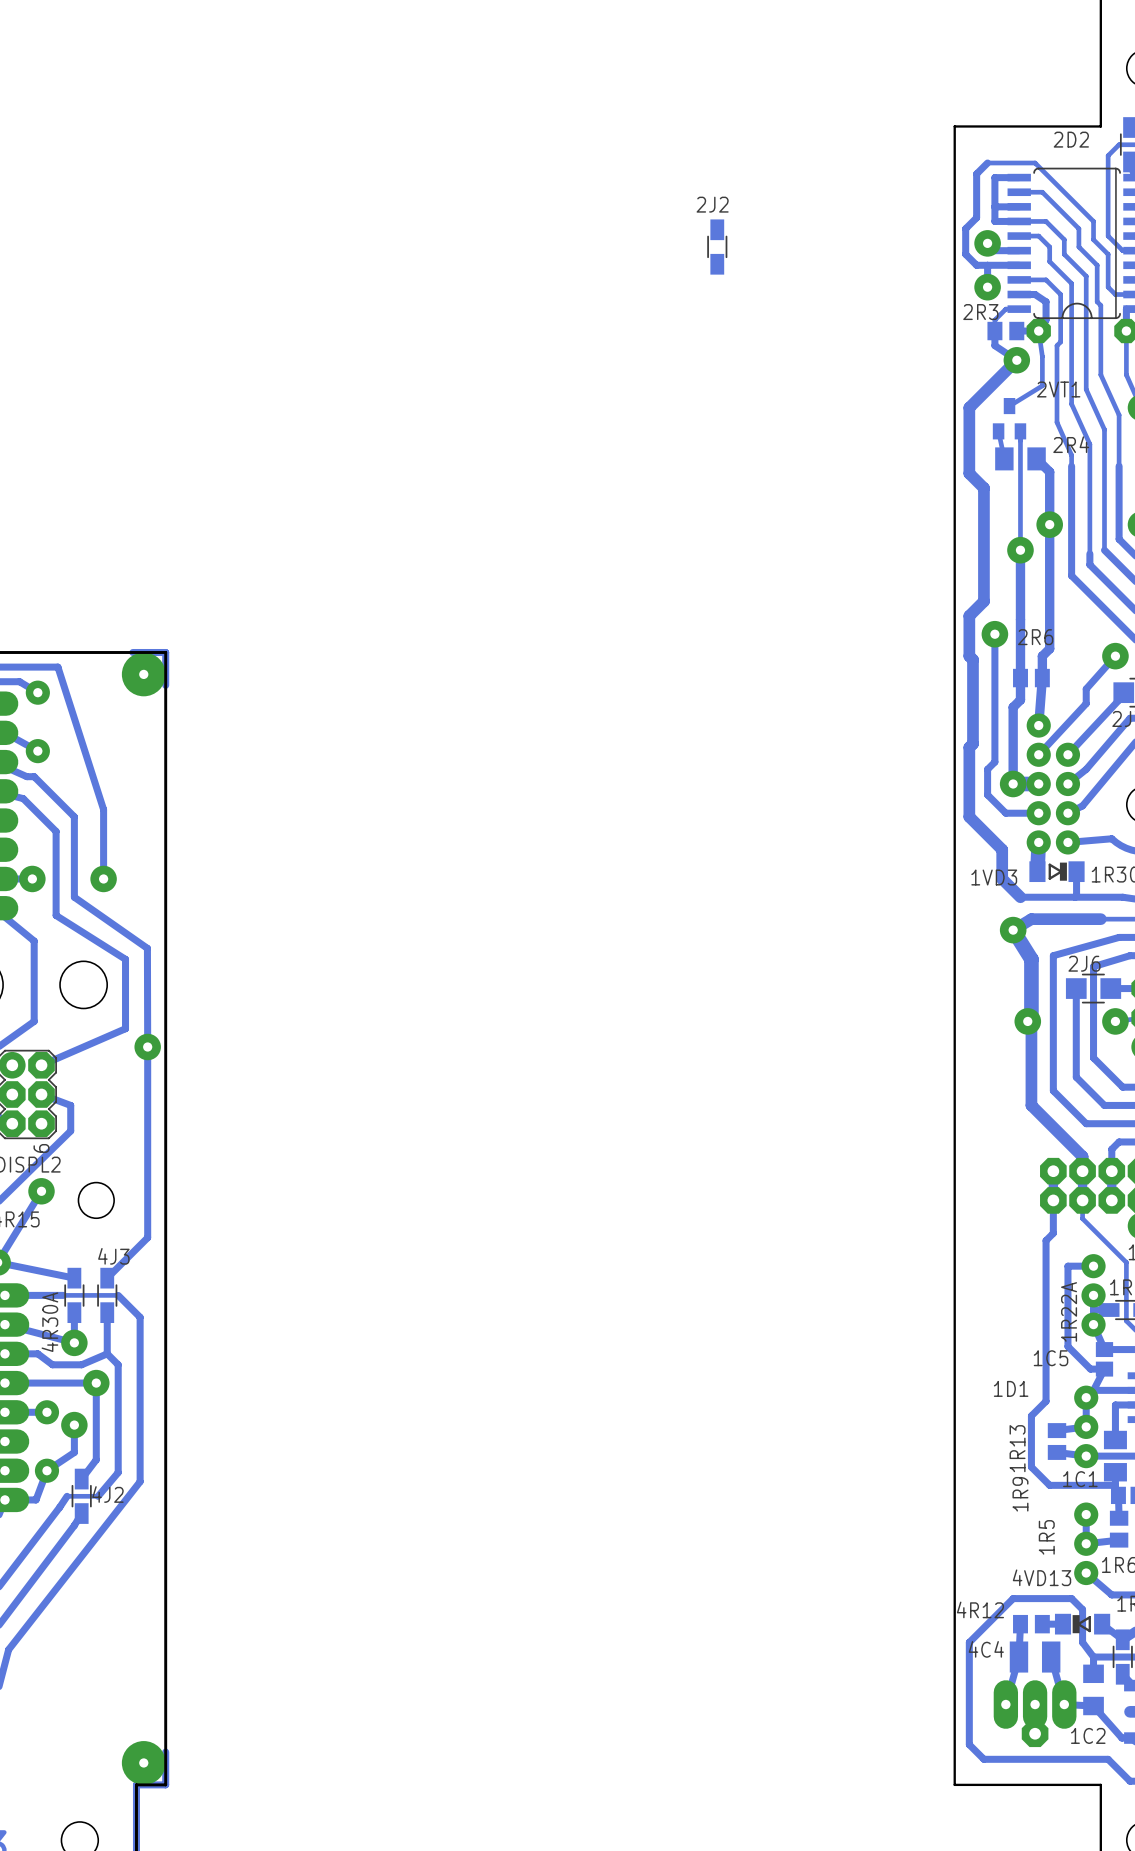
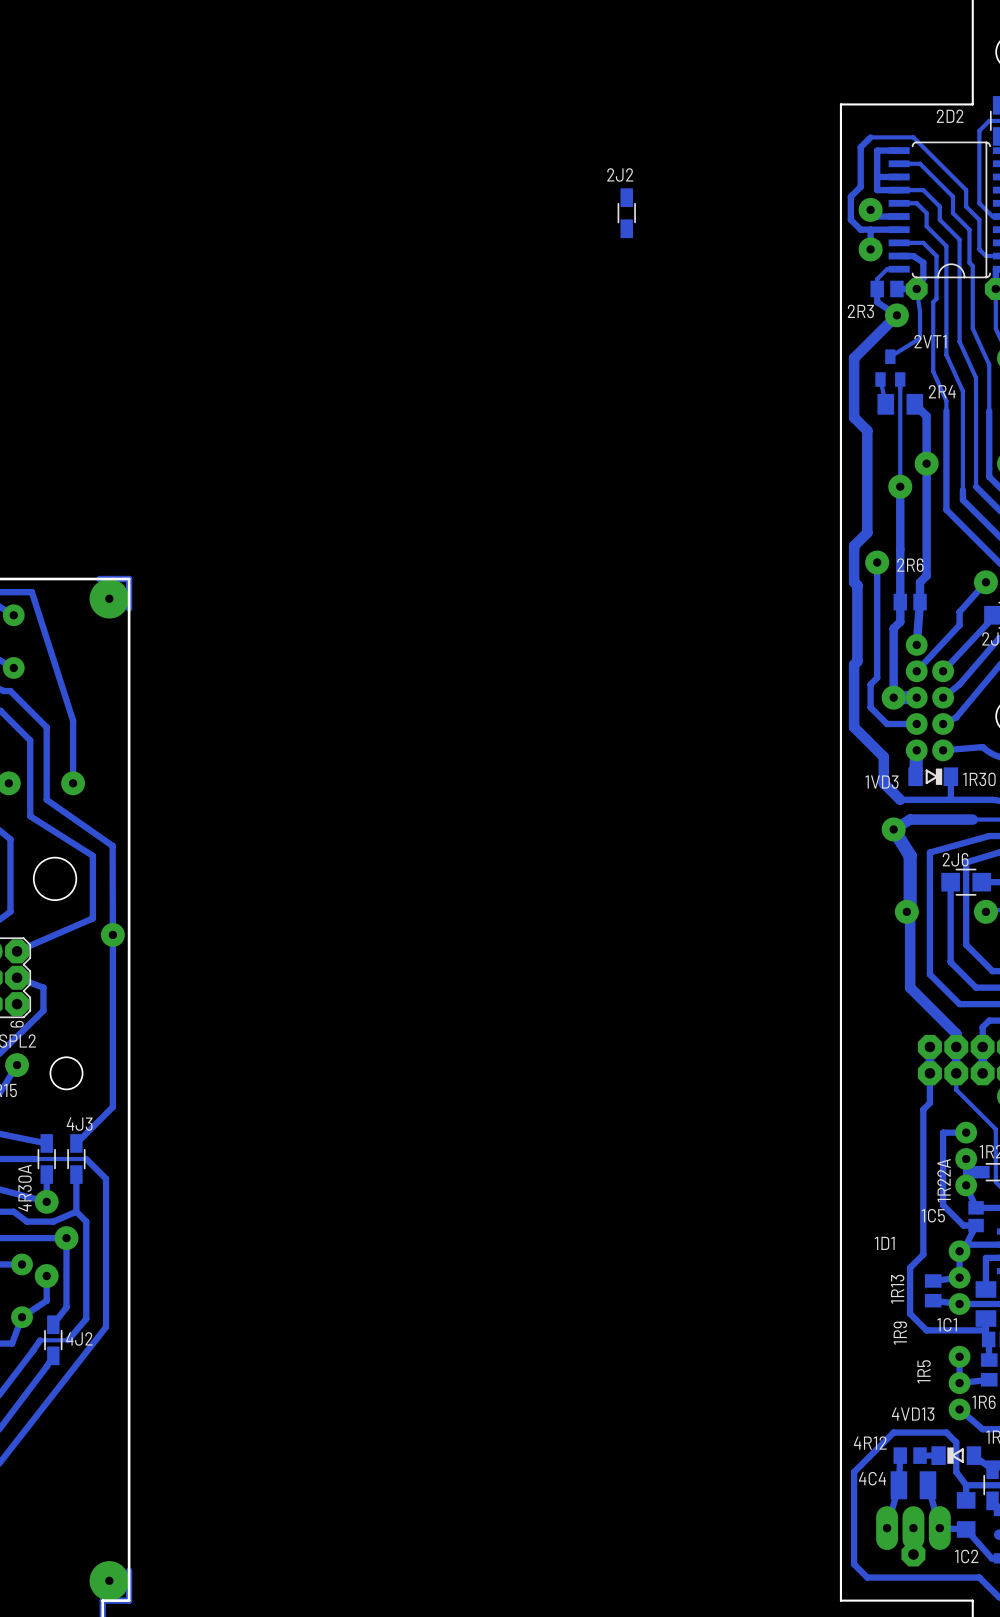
2R3 name position: 2R3 (980, 312) -> 2R3 (860, 311)

